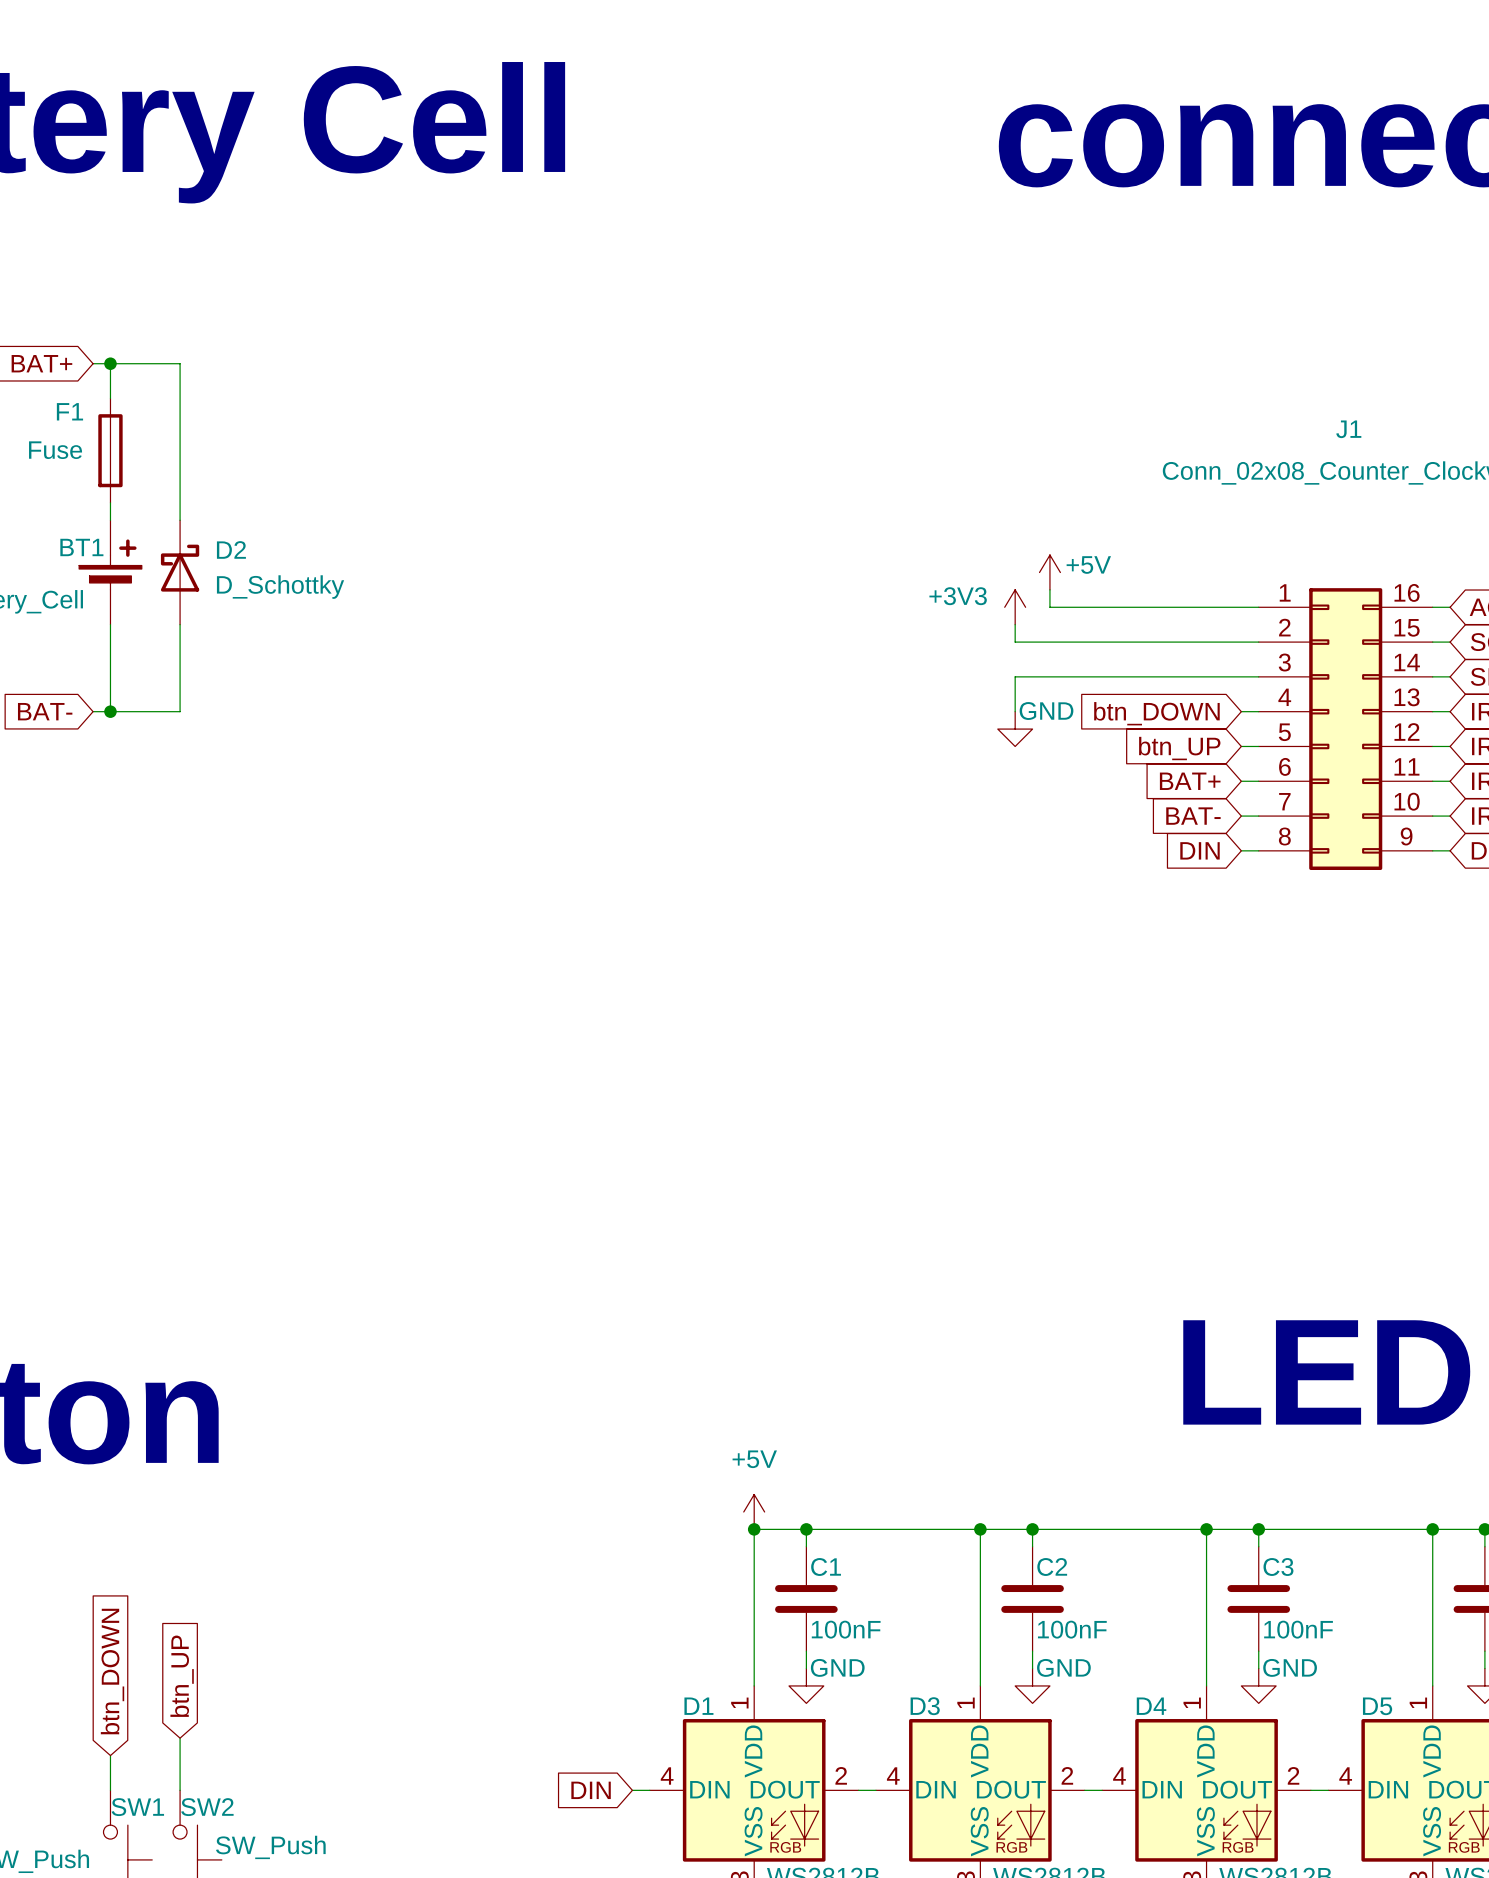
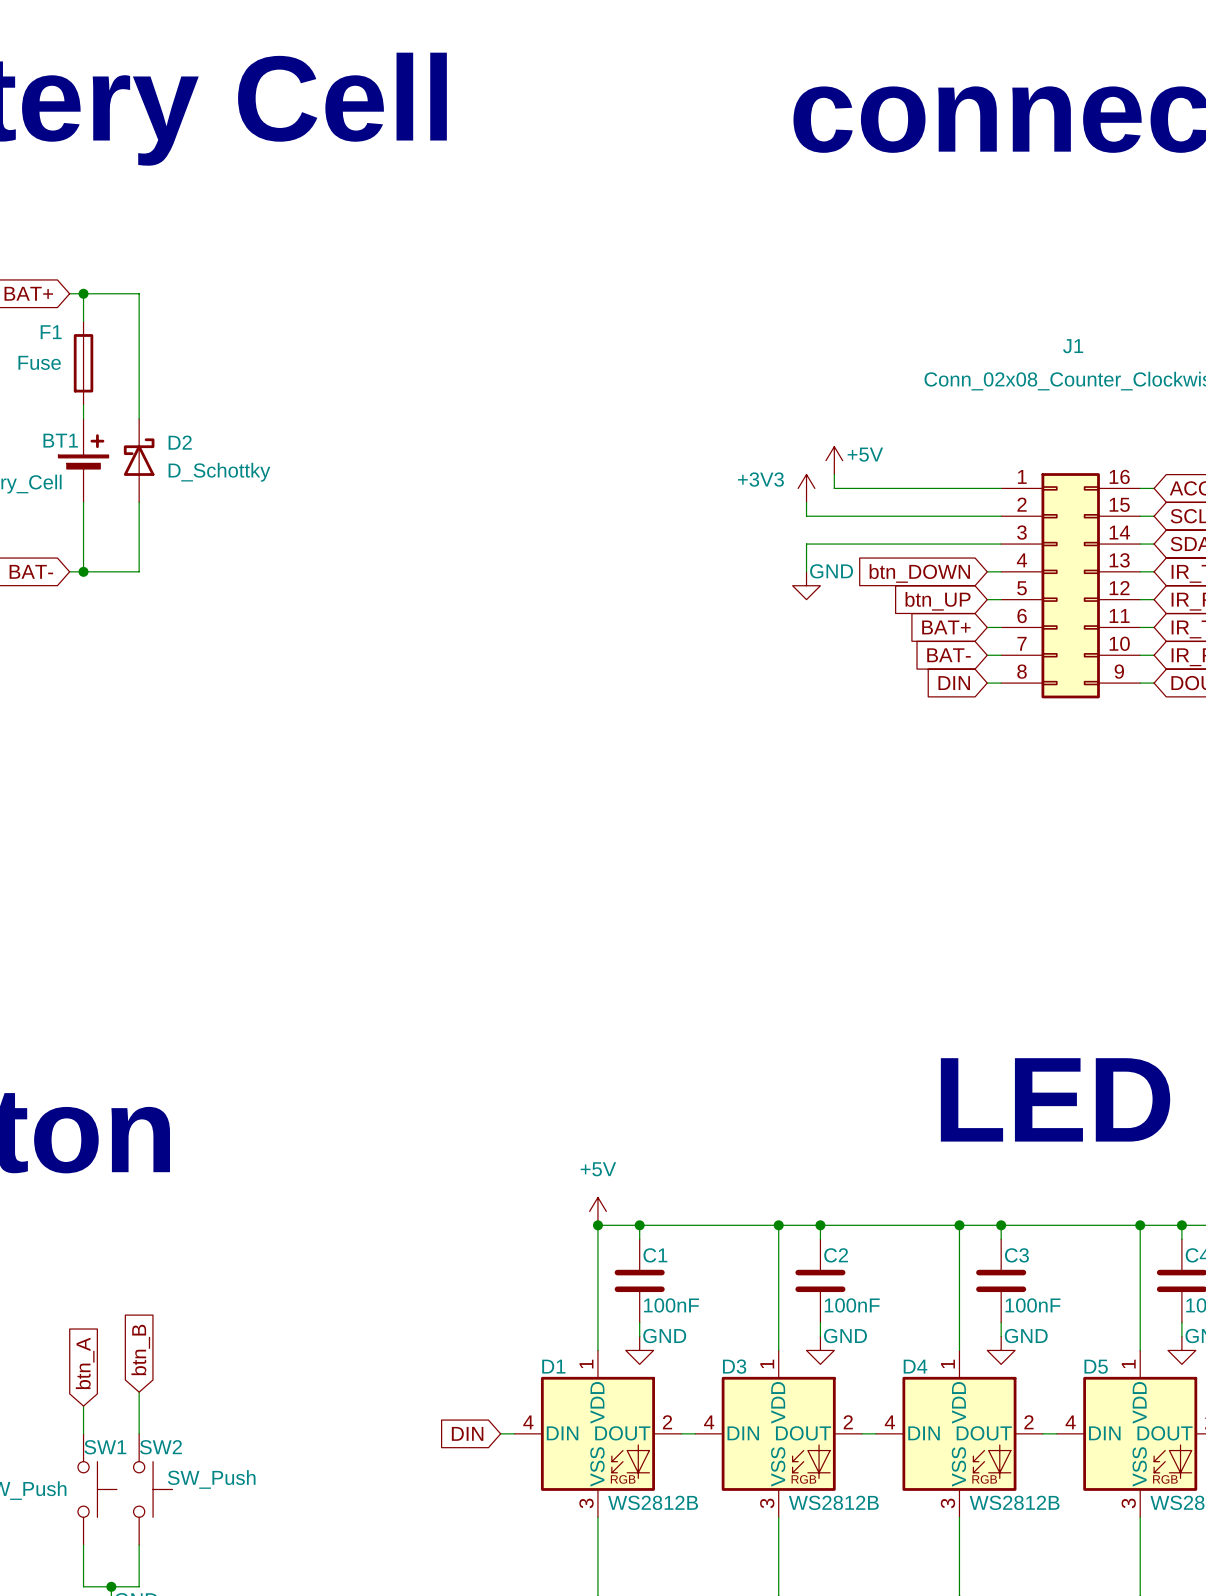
global label: btn_DOWN (112, 1671) -> btn_A (85, 1363)
global label: btn_UP (182, 1676) -> btn_B (140, 1349)

